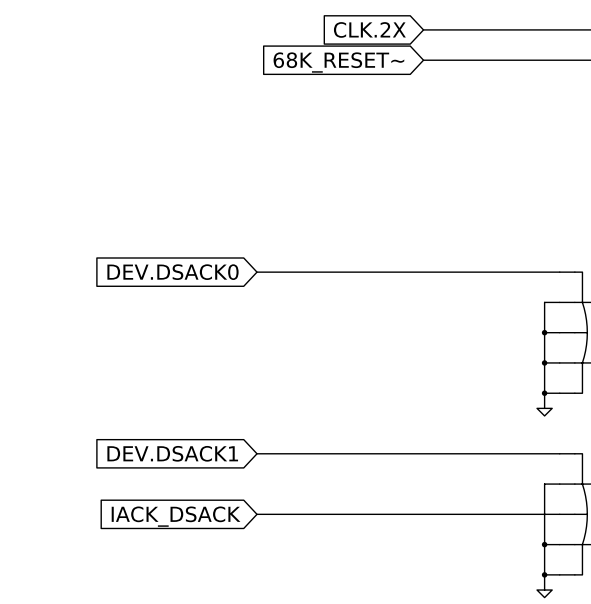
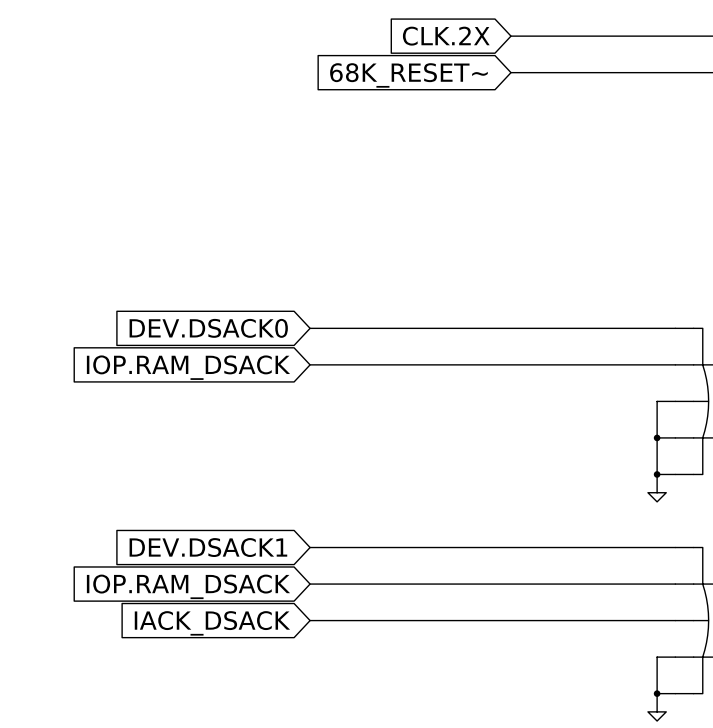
wire: (544, 302) (544, 332) -> (657, 364) (310, 364)
global label: none -> IOP.RAM_DSACK (188, 367)
junction: (544, 332) -> none
wire: (544, 484) (544, 544) -> (657, 584) (310, 584)
global label: none -> IOP.RAM_DSACK (188, 586)
junction: (544, 544) -> none

